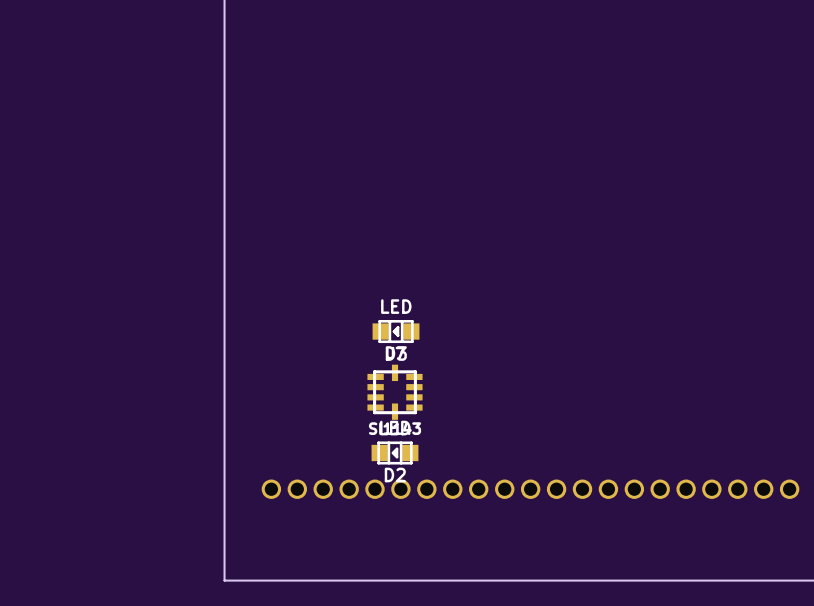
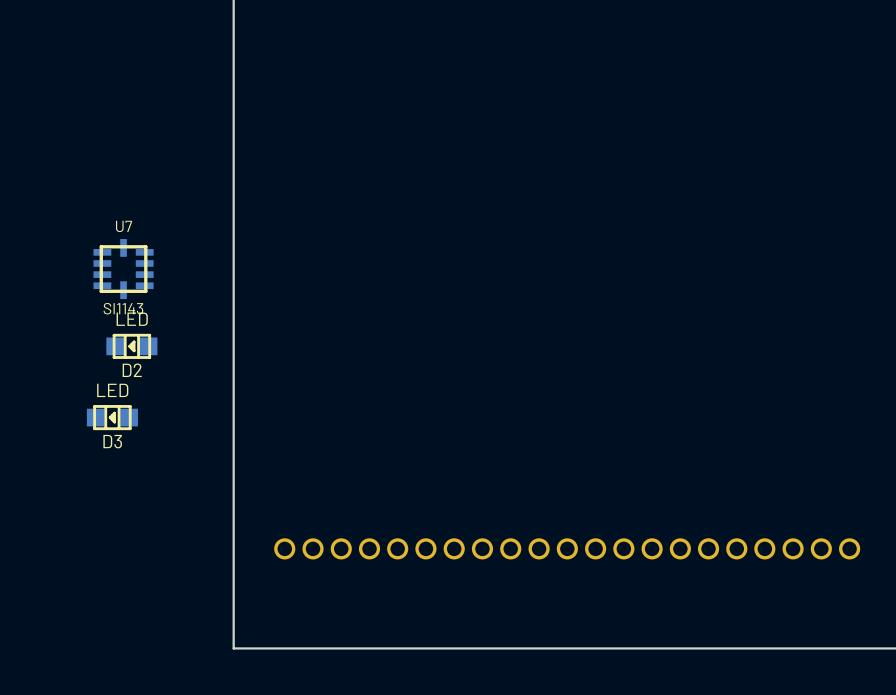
D3 position: (396, 331) -> (112, 417)
U7 position: (395, 392) -> (123, 269)
D2 position: (395, 452) -> (131, 346)

